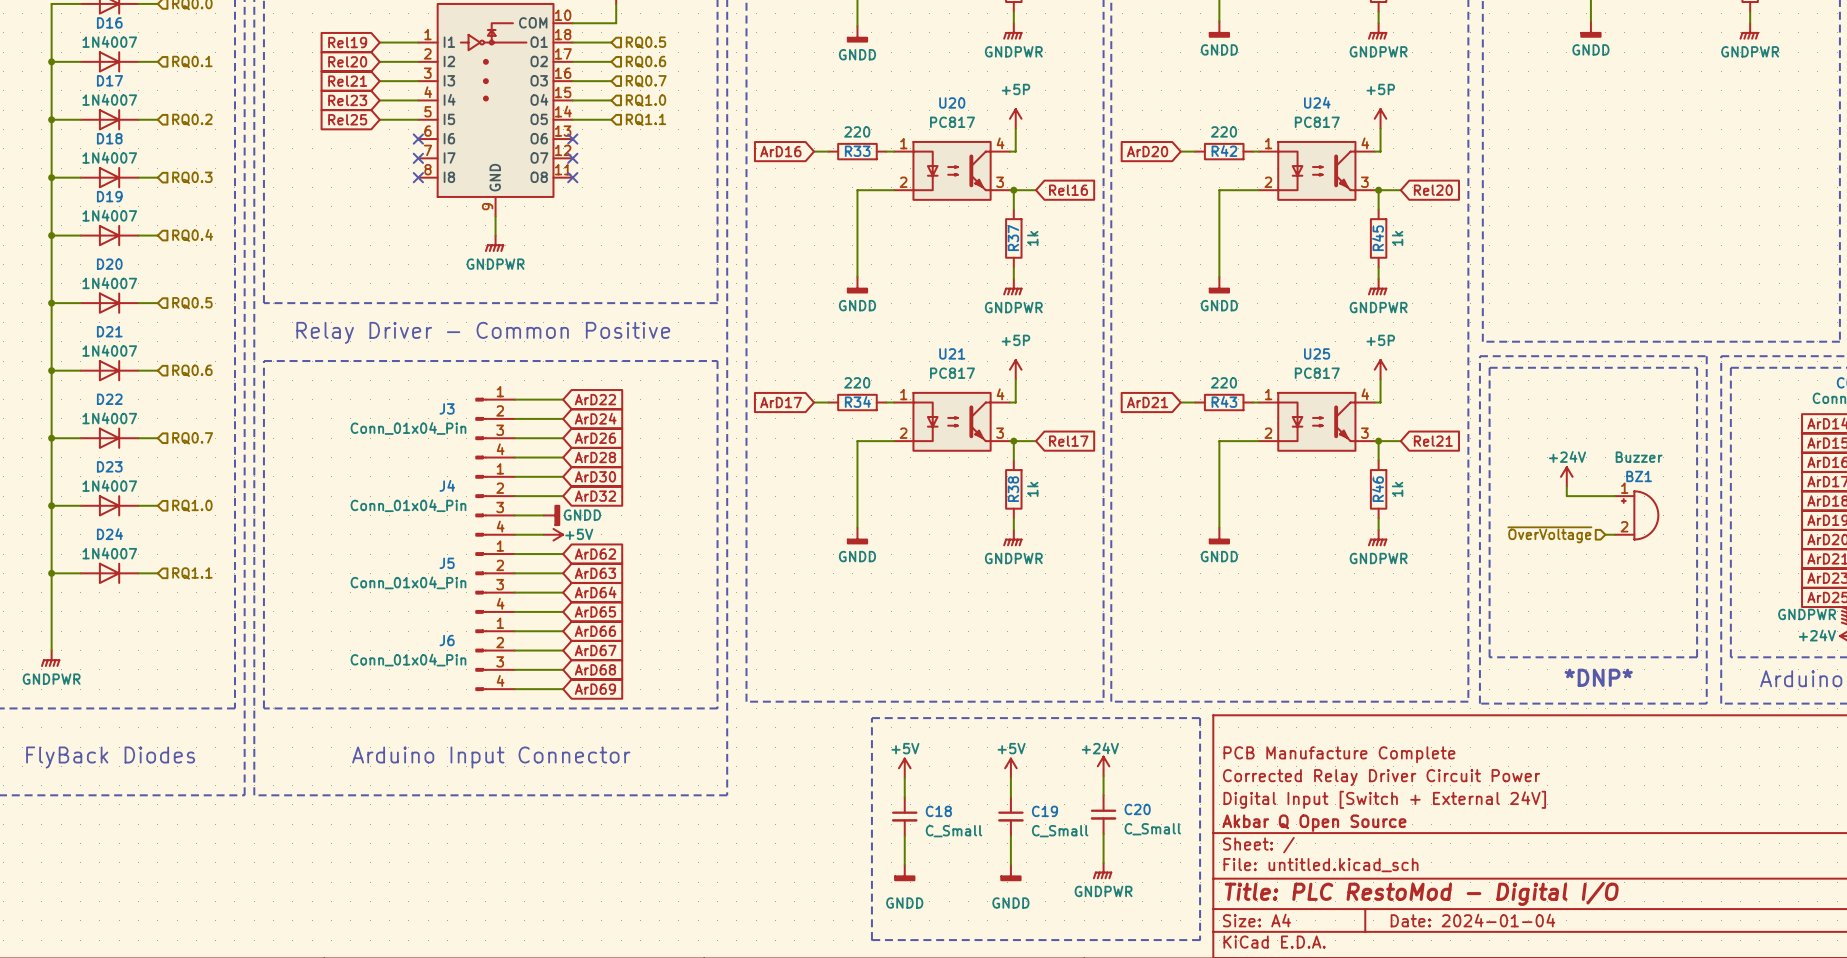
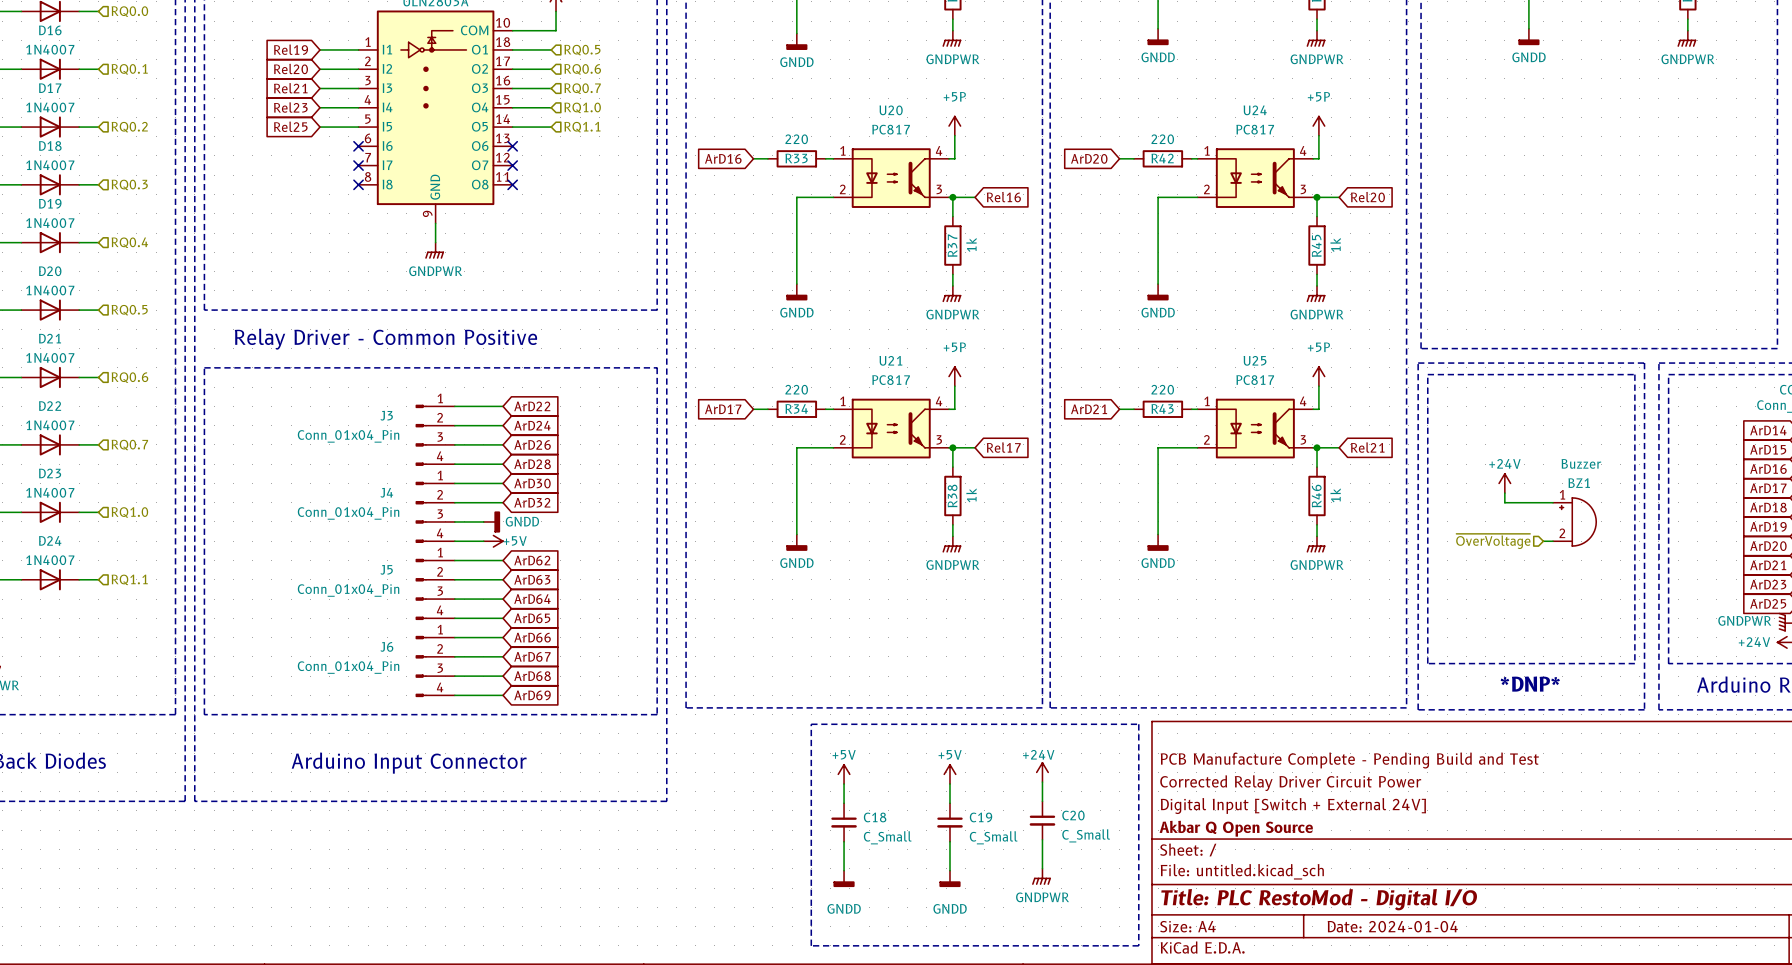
title block: PCB Manufacture Complete (1339, 754) -> PCB Manufacture Complete - Pending Build and Test (1349, 760)

